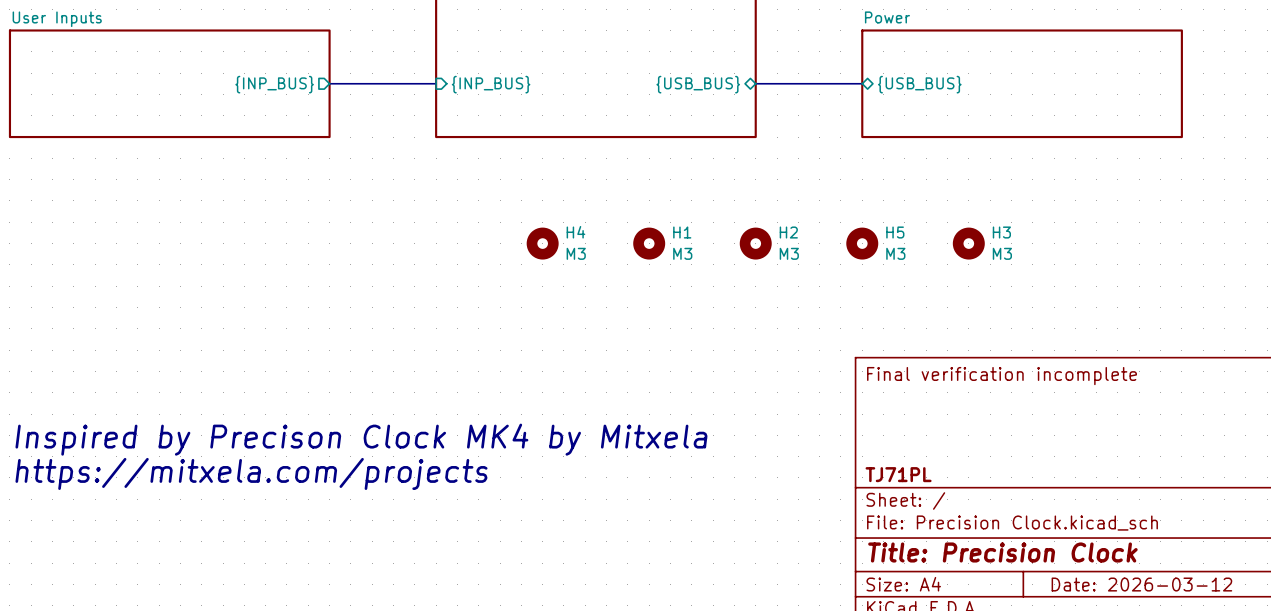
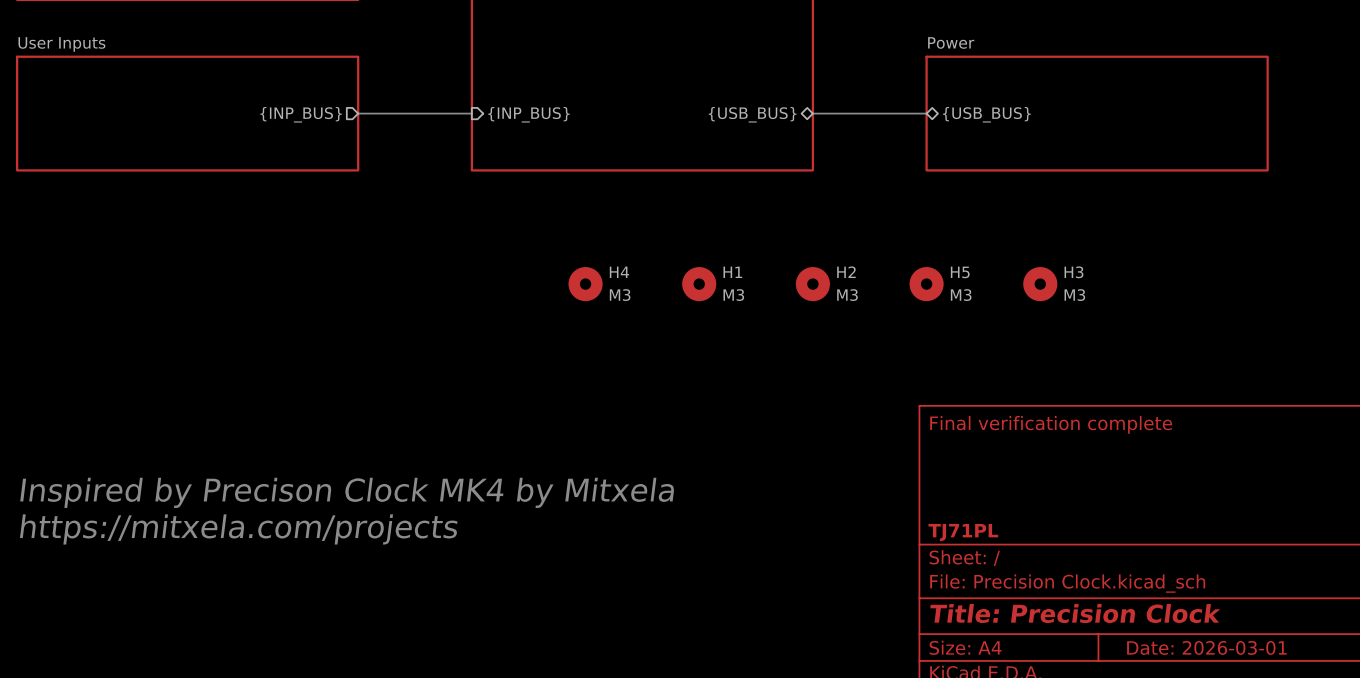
title block: Final verification incomplete (1002, 376) -> Final verification complete (1051, 424)
title block: Date: 2026-03-12 (1141, 584) -> Date: 2026-03-01 (1206, 647)

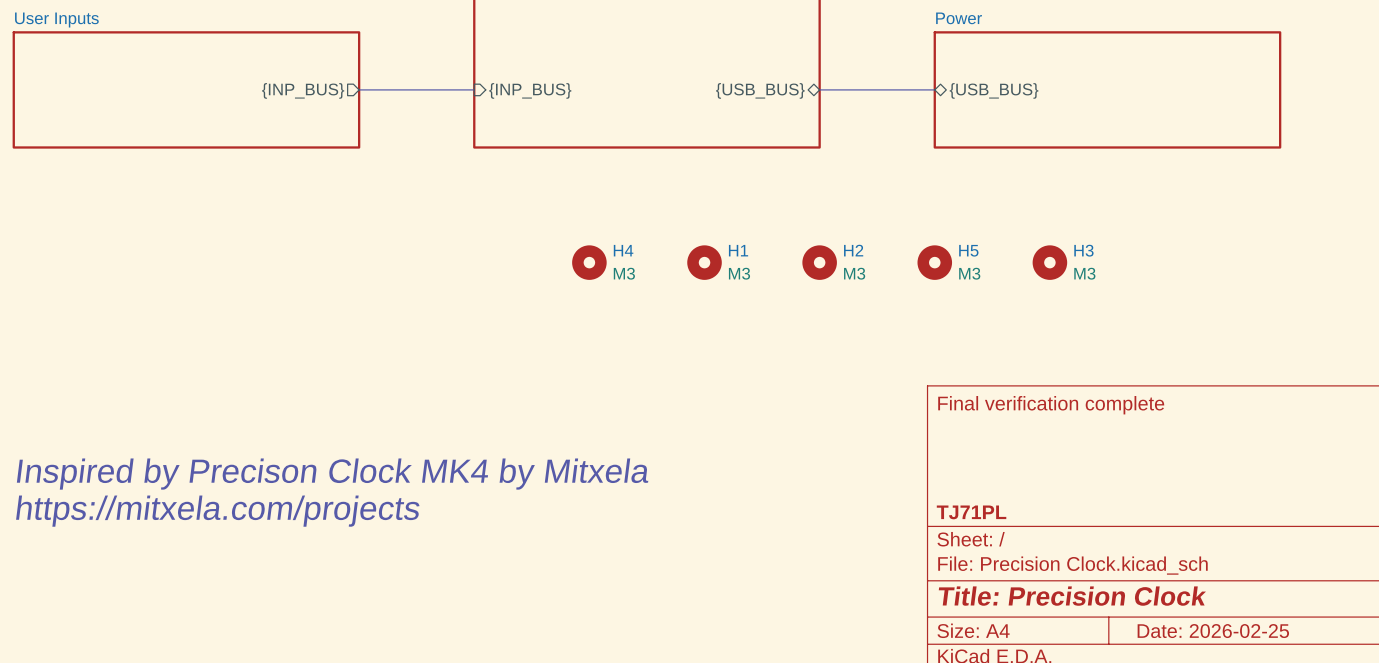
title block: Date: 2026-03-01 (1206, 647) -> Date: 2026-02-25 (1213, 631)

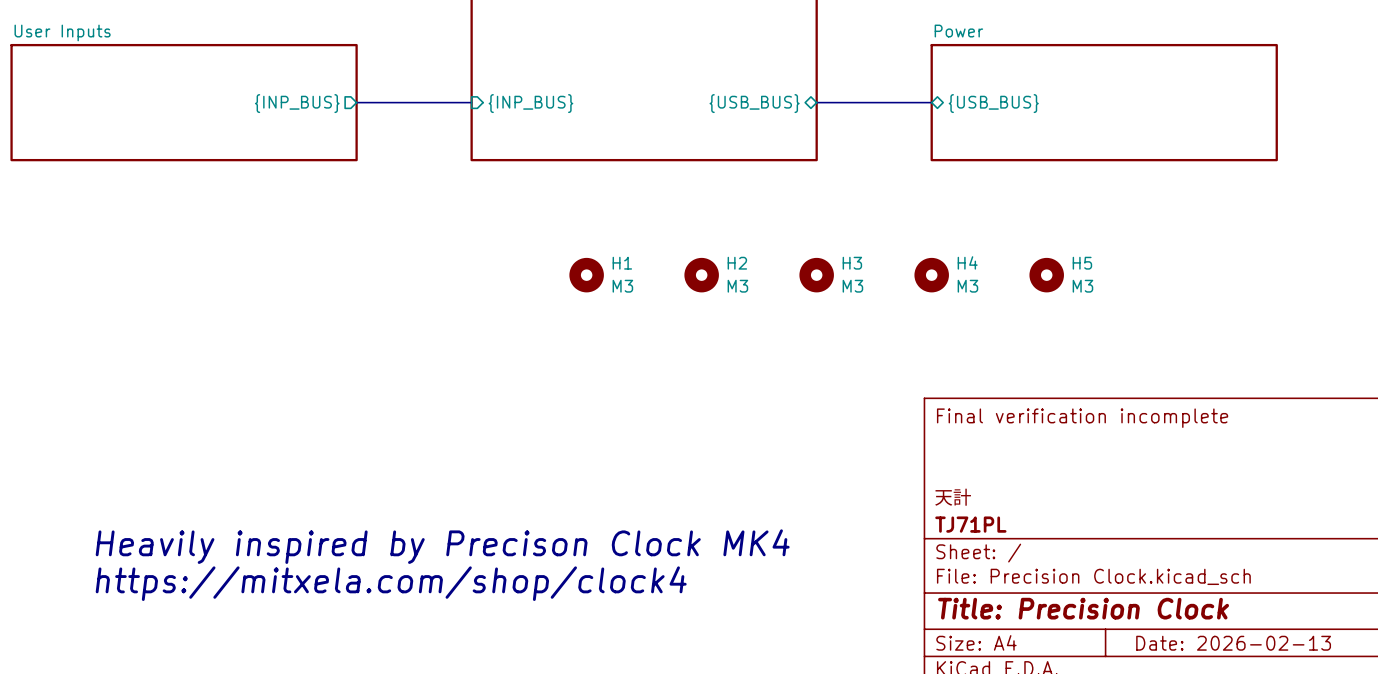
H4 name: H4 (623, 250) -> H1 (622, 263)
H1 name: H1 (738, 250) -> H2 (737, 263)
H2 name: H2 (853, 250) -> H3 (852, 263)
H5 name: H5 (968, 250) -> H4 (967, 262)
H3 name: H3 (1083, 250) -> H5 (1082, 263)
title block: Final verification complete (1051, 405) -> Final verification incomplete (1082, 418)
text: Inspired by Precison Clock MK4 by Mitxela (332, 474) -> none
title block: none -> 天計 (953, 497)
text: https://mitxela.com/projects (217, 511) -> none
text: none -> Heavily inspired by Precison Clock MK4 (442, 546)
text: none -> https://mitxela.com/shop/clock4 (391, 583)
title block: Date: 2026-02-25 (1213, 631) -> Date: 2026-02-13 (1233, 643)

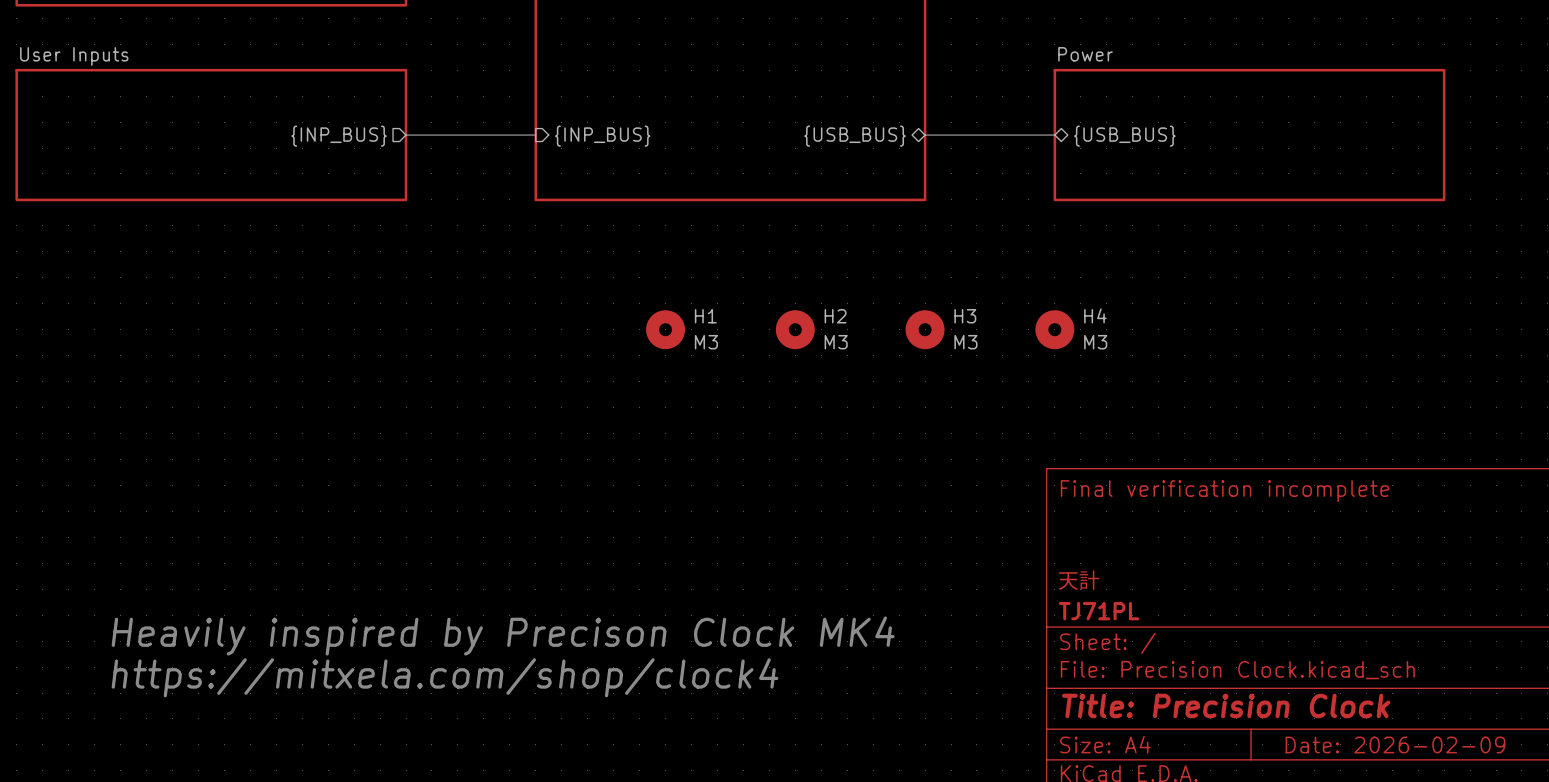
H5: M3 (1046, 275) -> none
title block: Date: 2026-02-13 (1233, 643) -> Date: 2026-02-09 (1395, 744)

